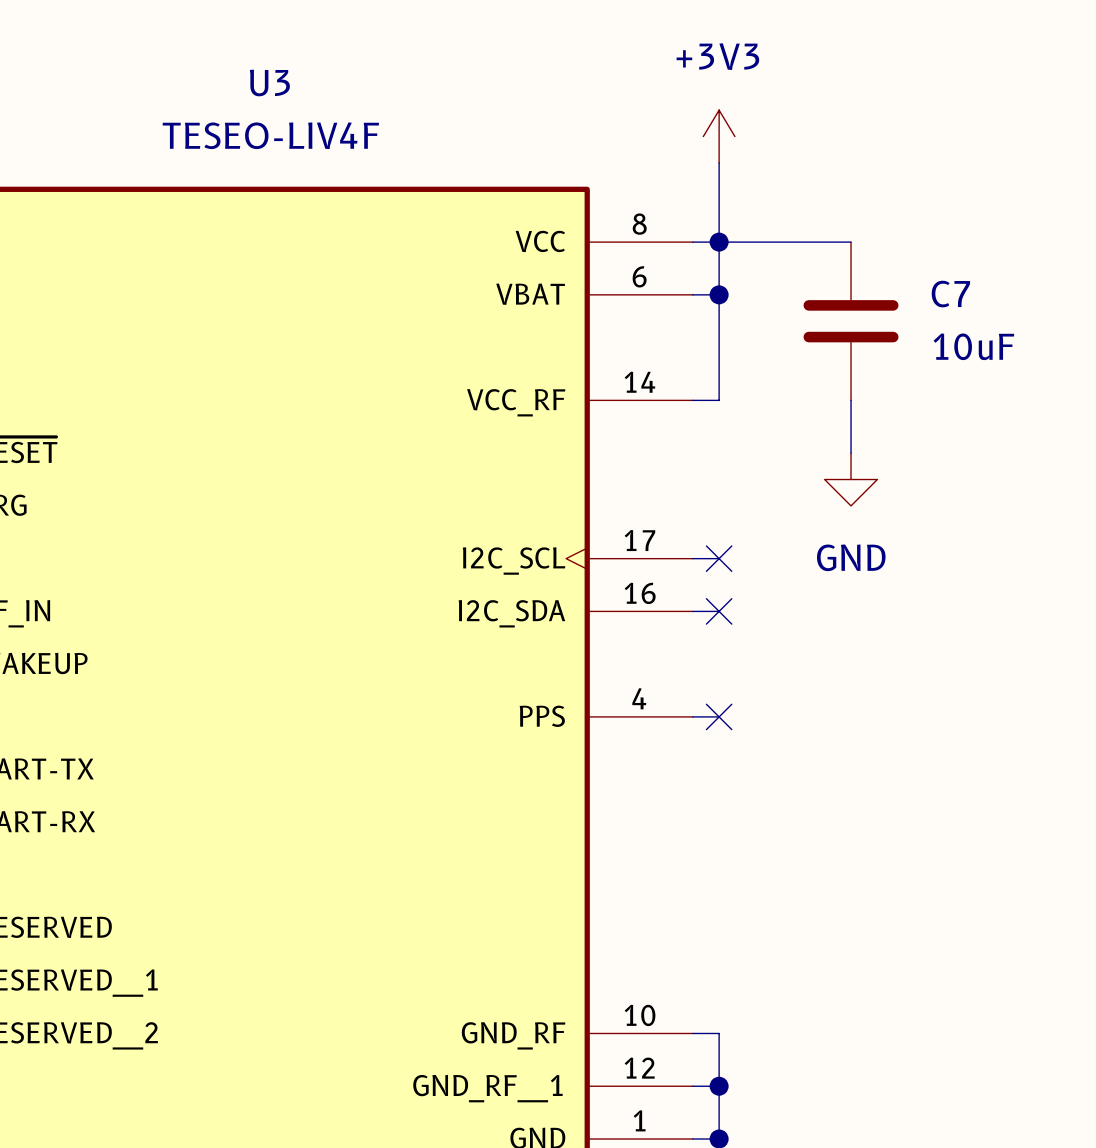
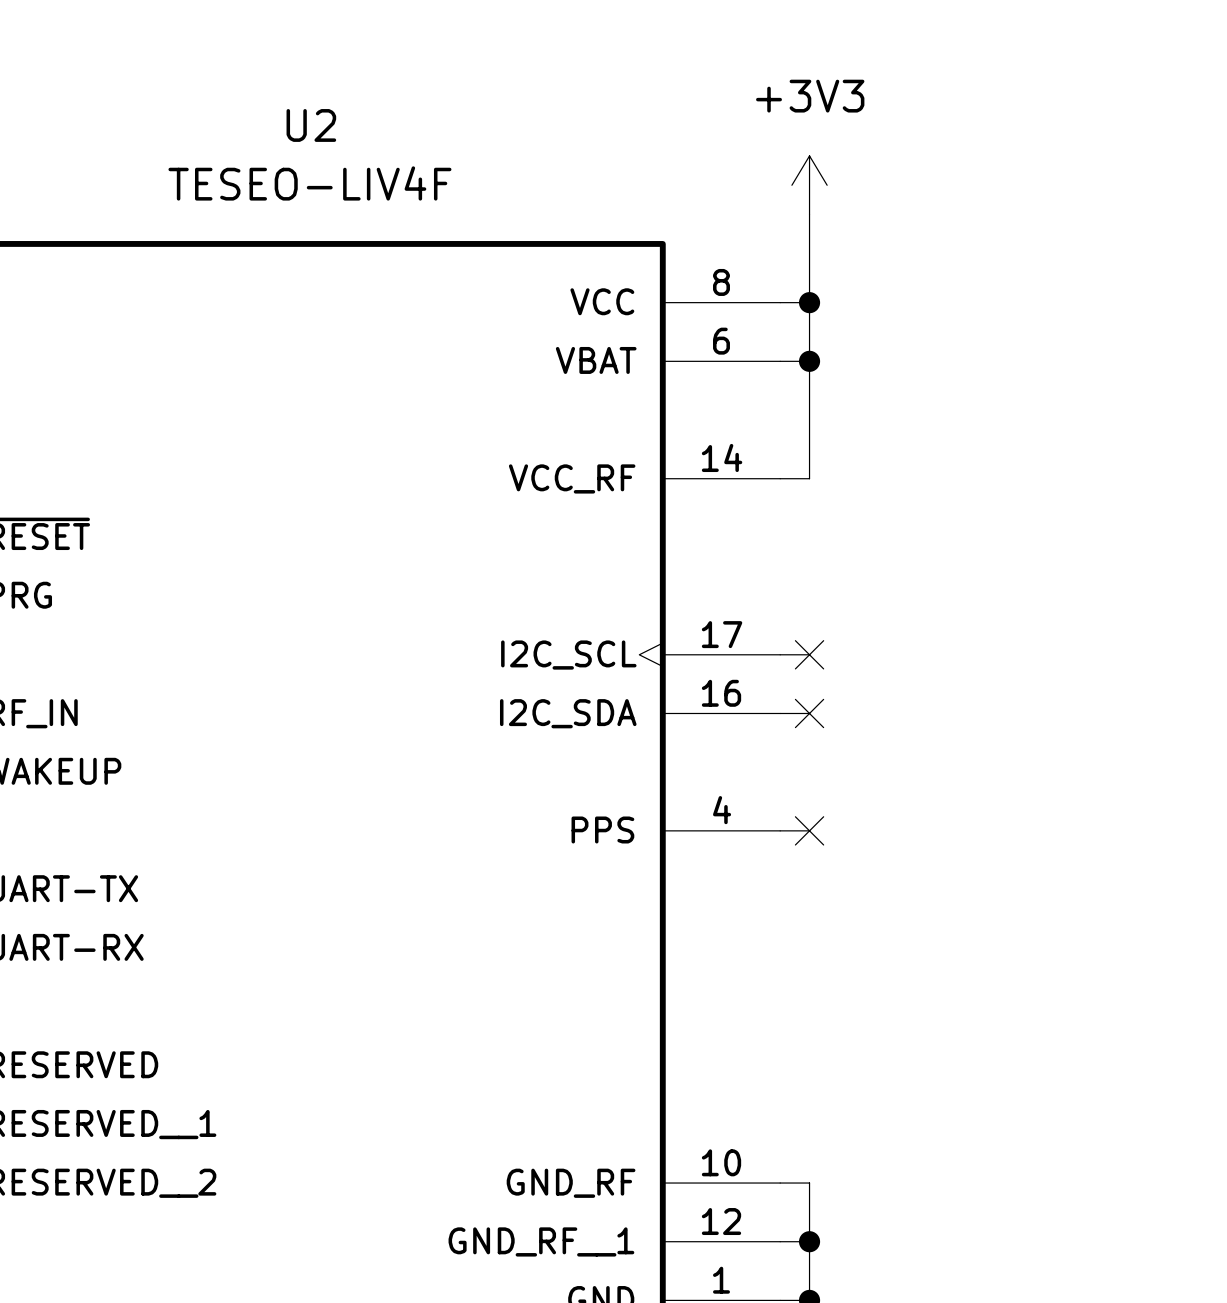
U3 name: U3 (269, 82) -> U2 (311, 125)
wire: (719, 242) (851, 242) -> none
C7: 10uF (851, 321) -> none
wire: (851, 400) (851, 453) -> none
power symbol: GND (851, 479) -> none

